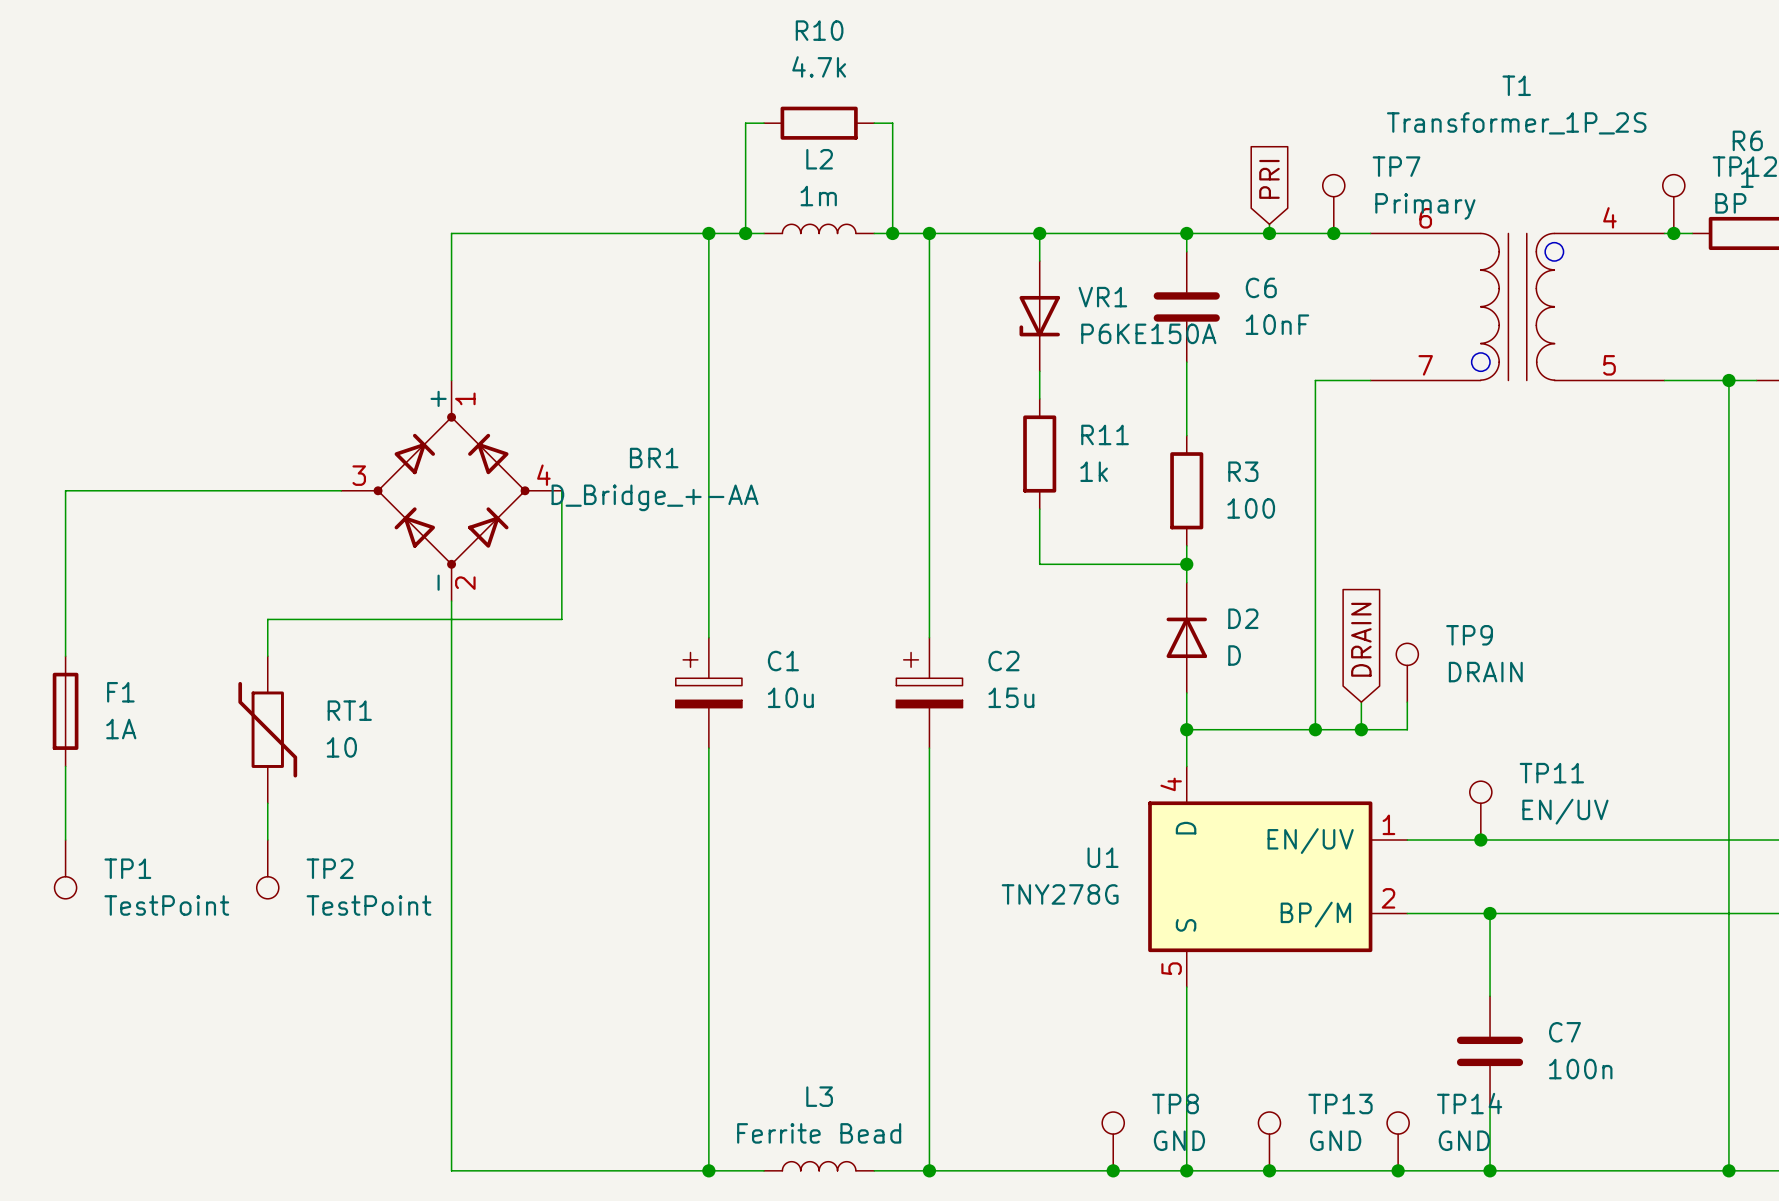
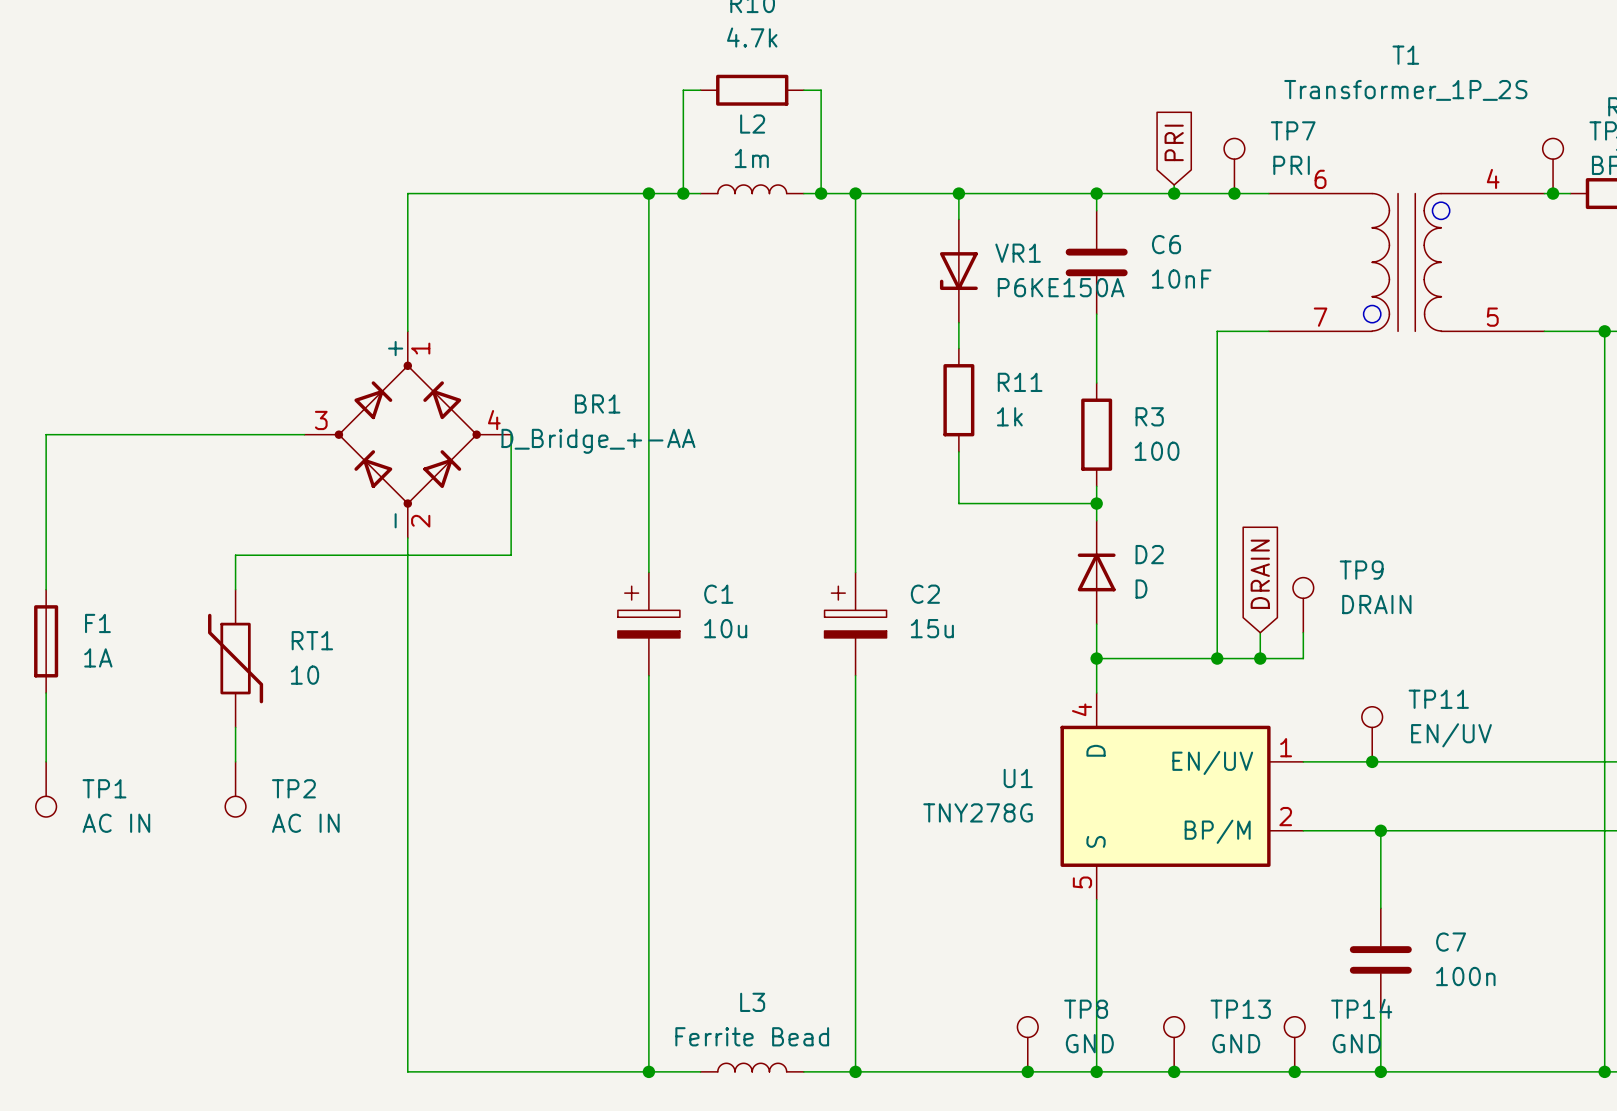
TP7 value: Primary (1425, 206) -> PRI (1291, 165)
TP1 value: TestPoint (166, 905) -> AC IN (116, 823)
TP2 value: TestPoint (368, 905) -> AC IN (305, 823)

